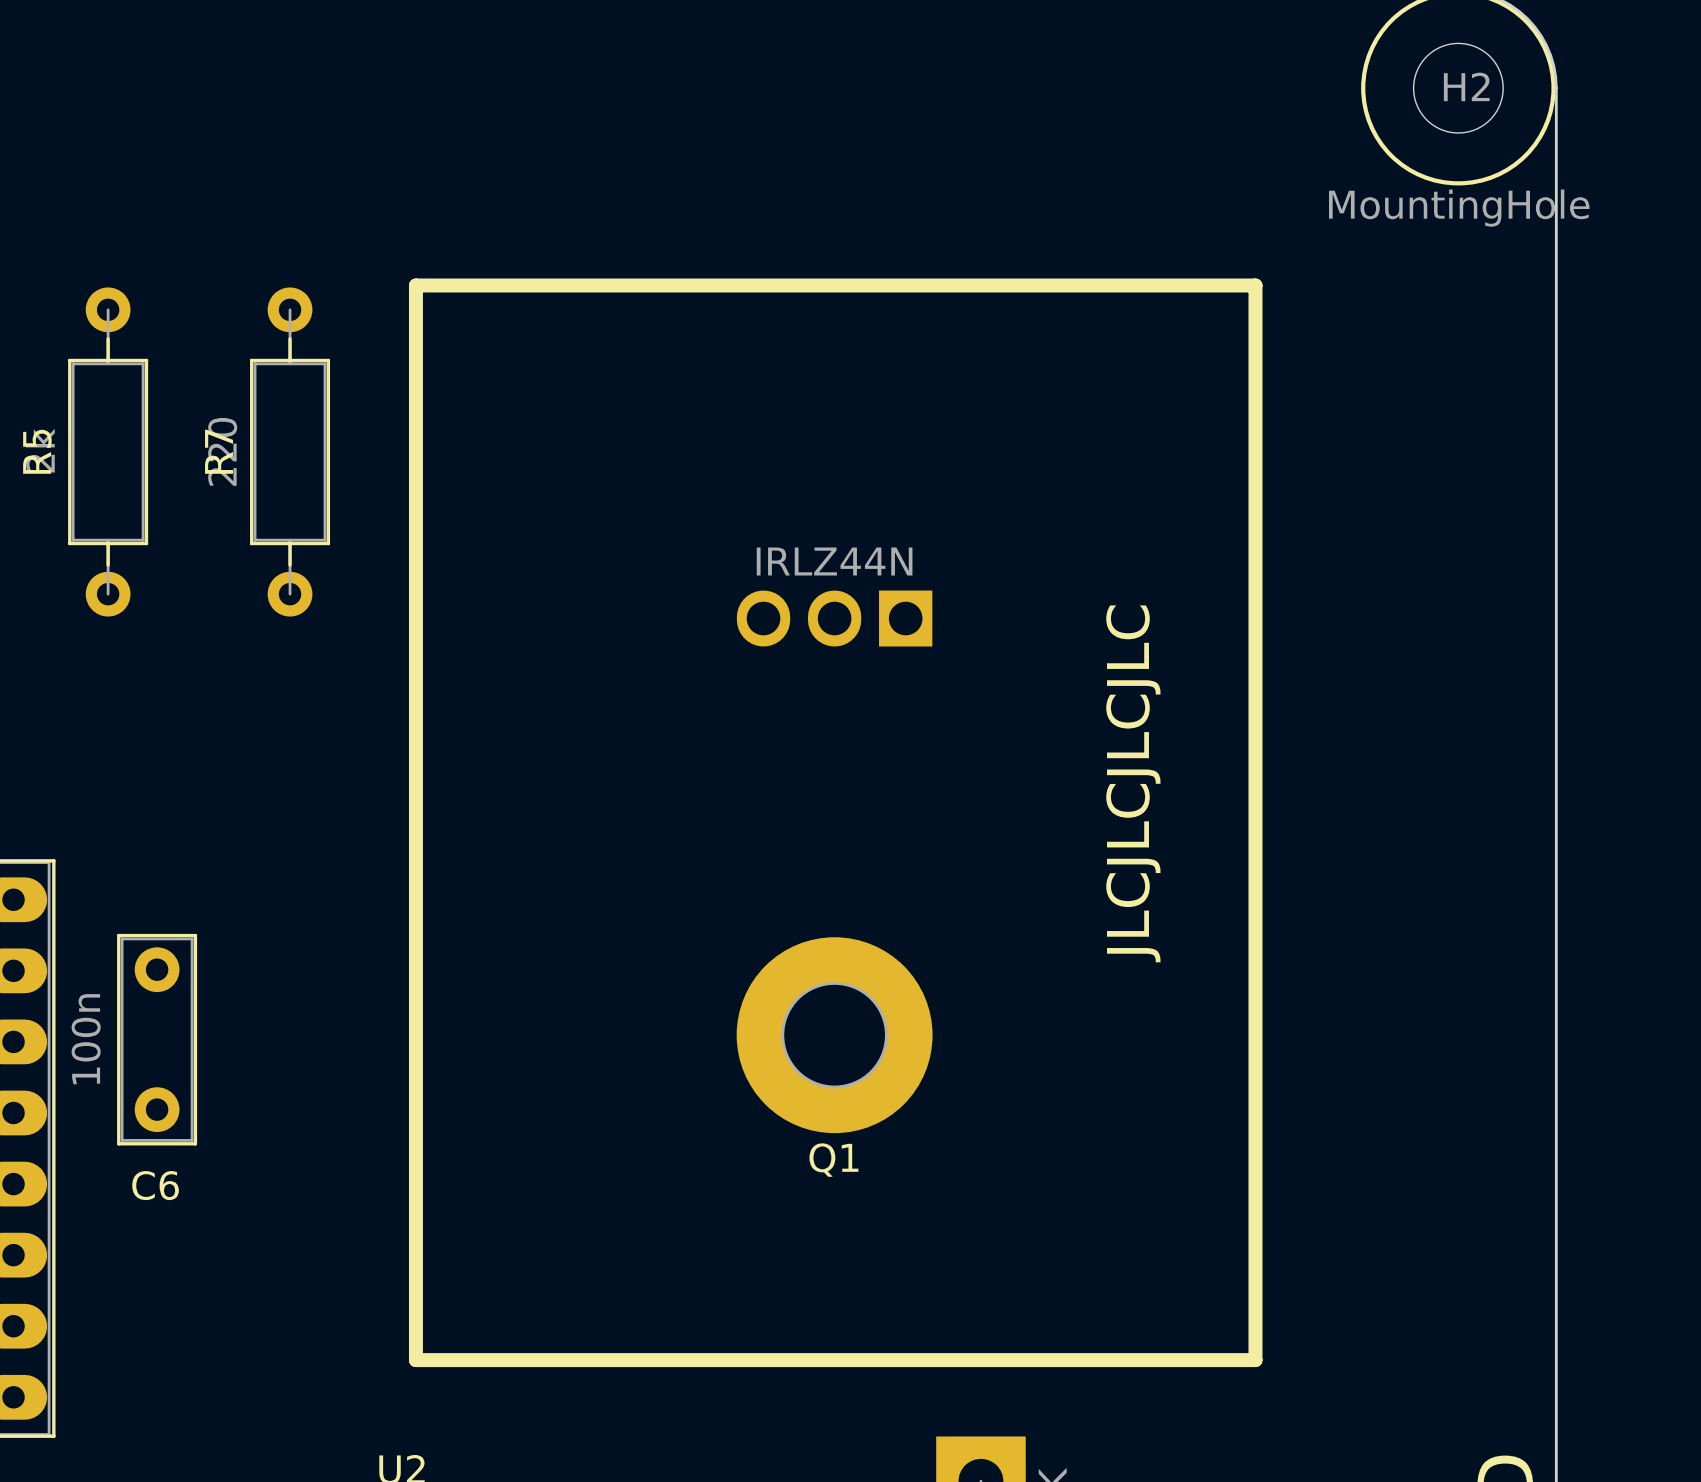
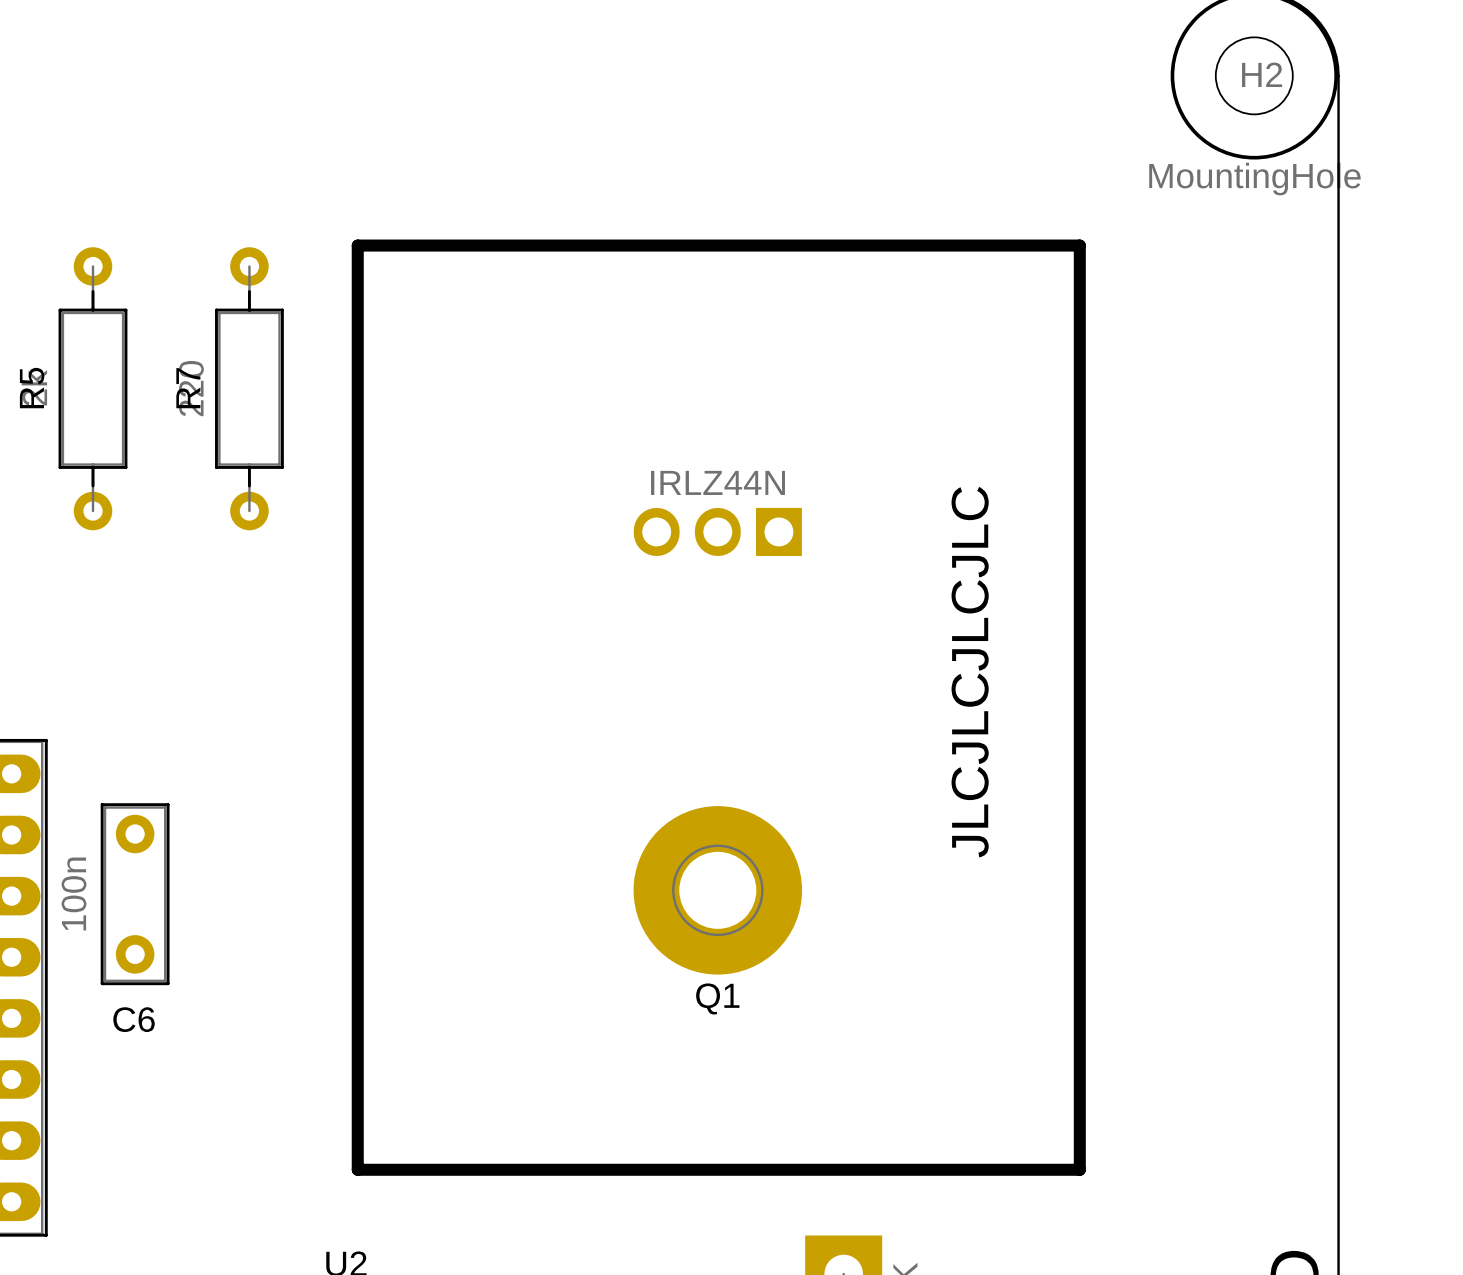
Q1 footprint: [408, 278, 1263, 1368] -> [351, 239, 1086, 1176]

